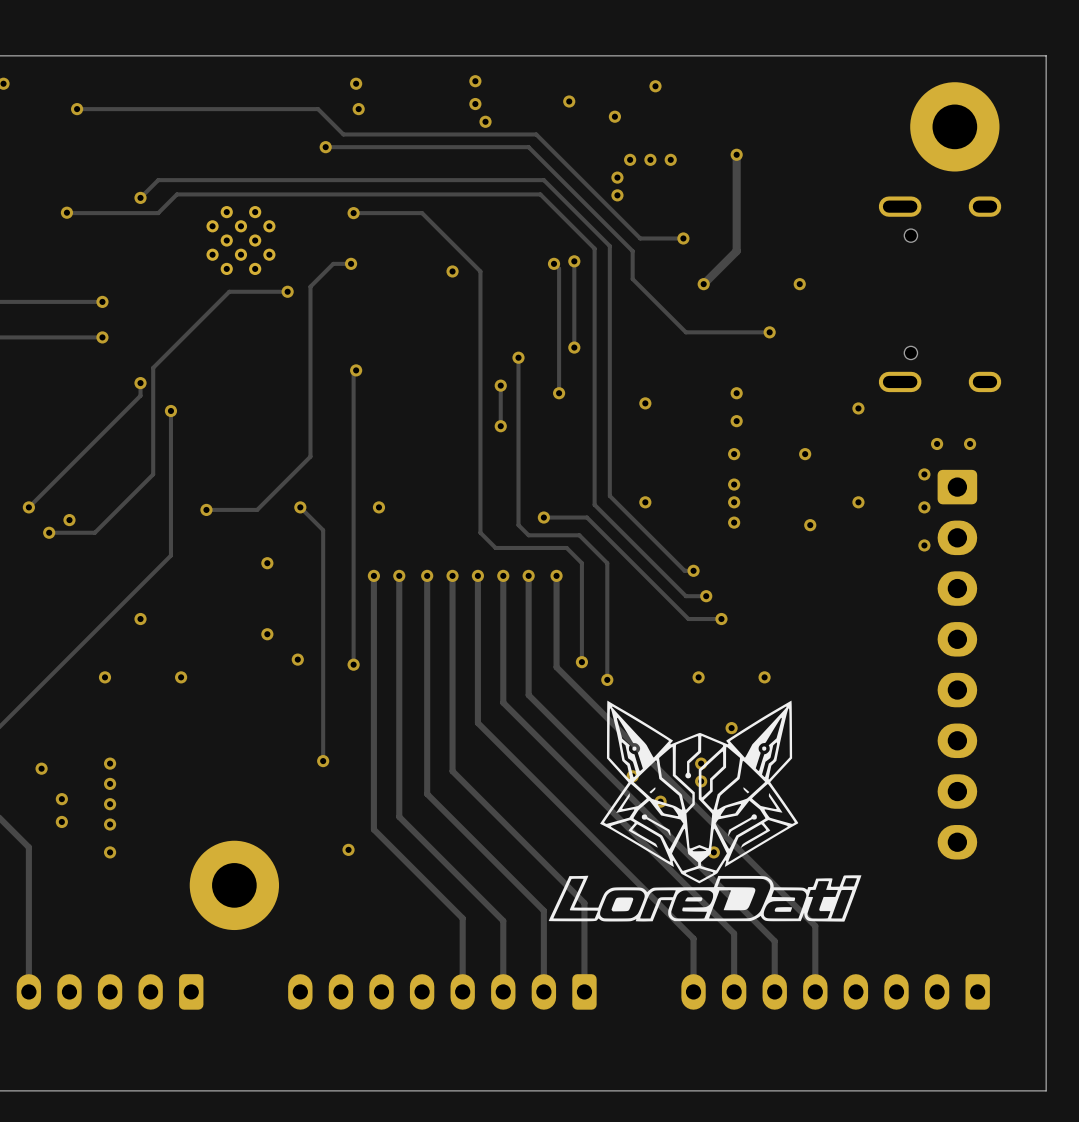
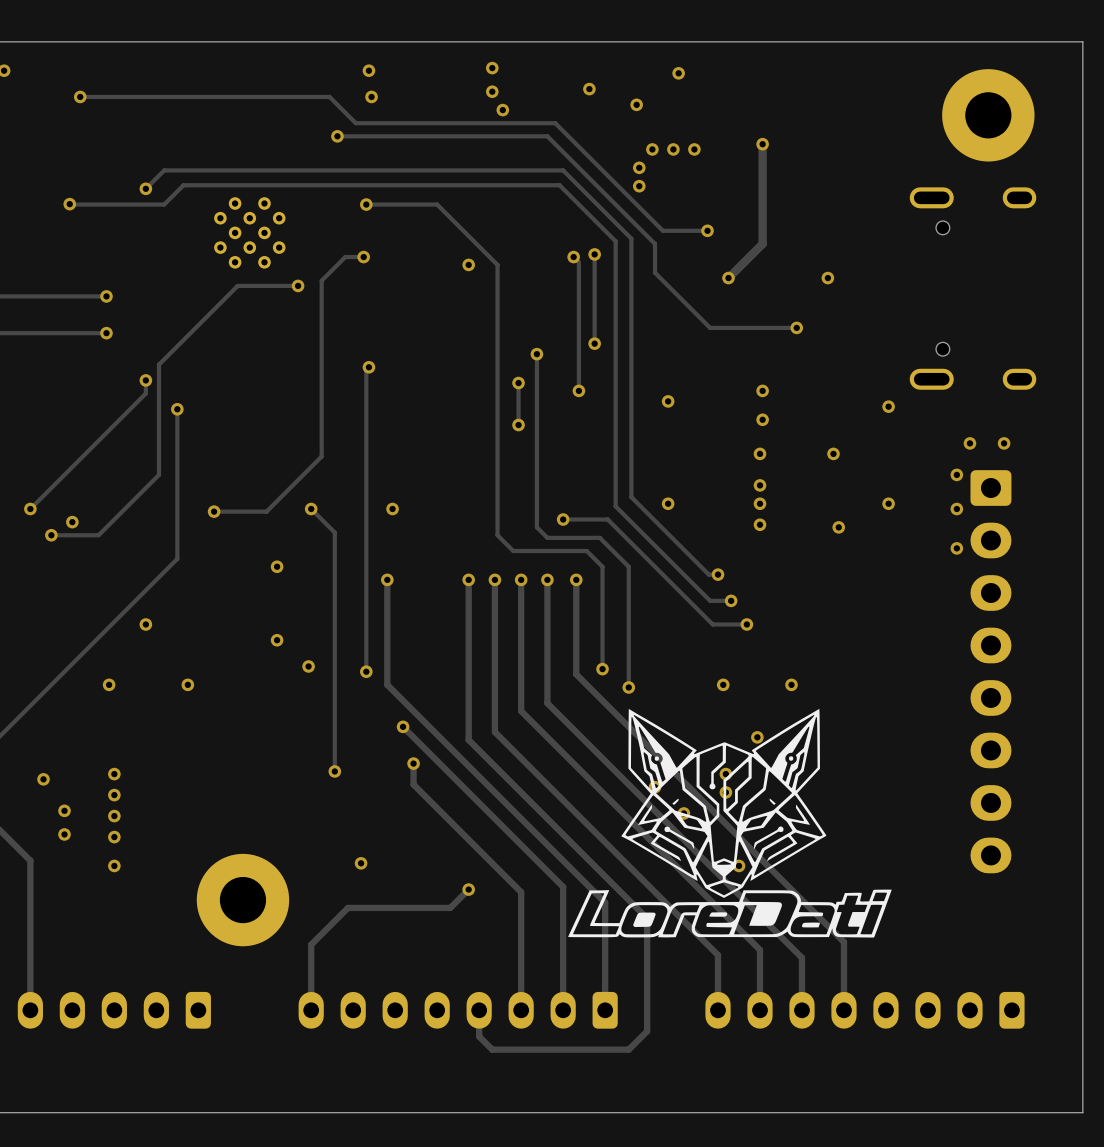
track: (399, 575) (399, 753) -> none
via: (399, 575) -> none
track: (427, 575) (427, 794) (543, 910) -> (403, 726) (563, 886) (563, 926)
via: (427, 575) -> none
track: (373, 677) (373, 829) (462, 918) (462, 991) -> (468, 739) (647, 918) (647, 1031) (628, 1049) (492, 1049) (479, 1036) (479, 1010)
via: none -> (403, 726)
track: (452, 730) (452, 771) (584, 903) -> (387, 684) (605, 902) (605, 918)
via: none -> (413, 763)
track: (399, 773) (399, 816) (503, 920) -> (413, 784) (521, 892) (521, 936)
track: none -> (468, 889) (450, 907) (347, 907) (311, 944) (311, 1010)
via: none -> (468, 889)

